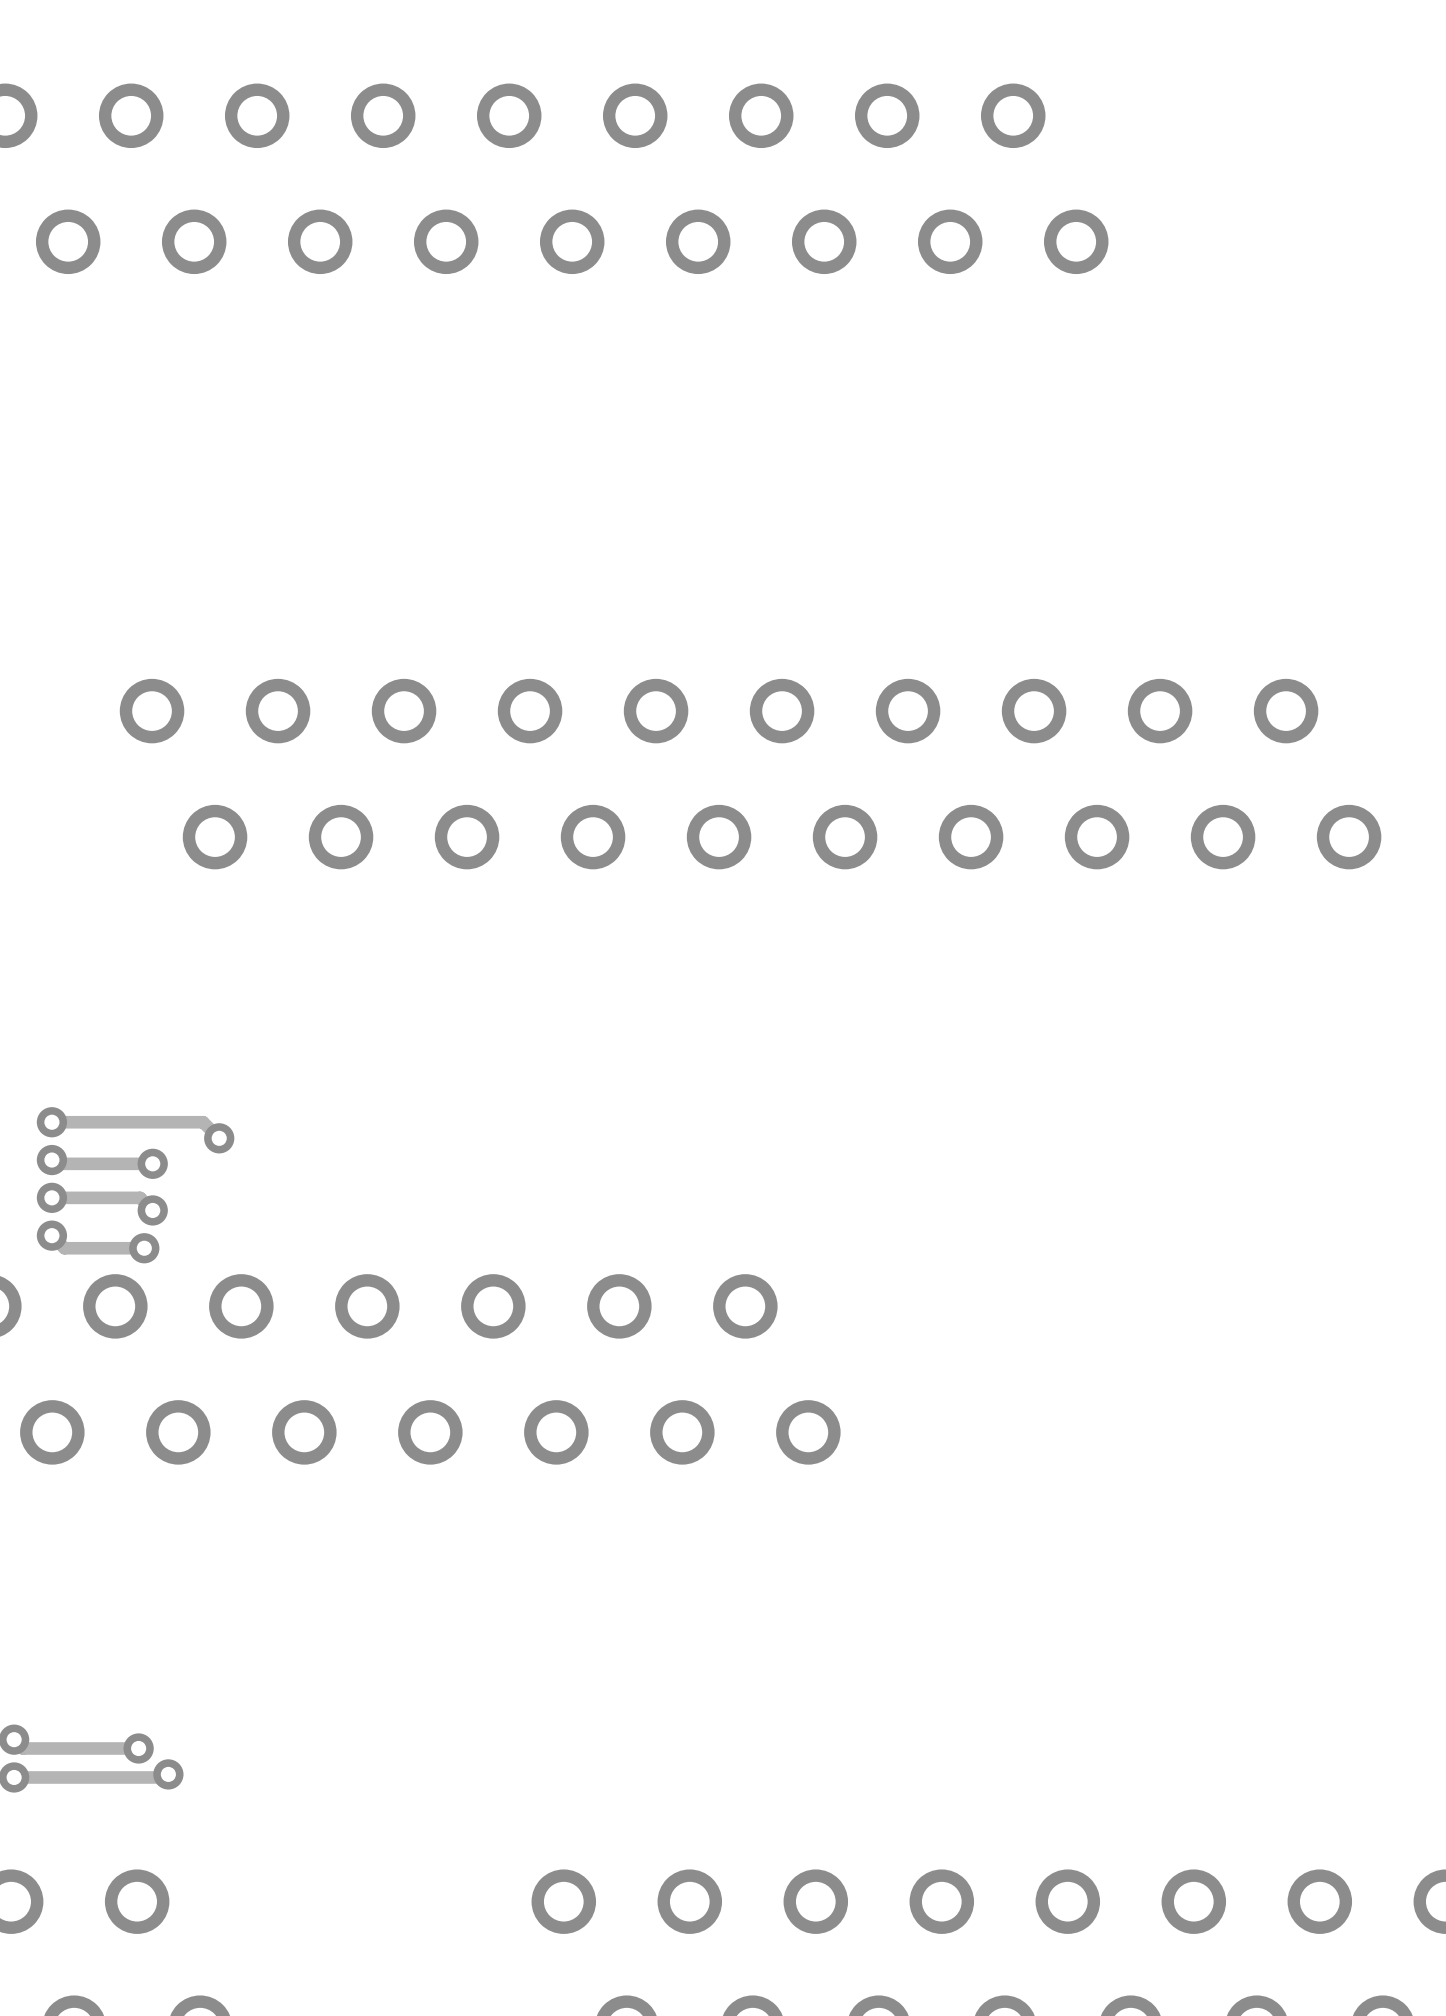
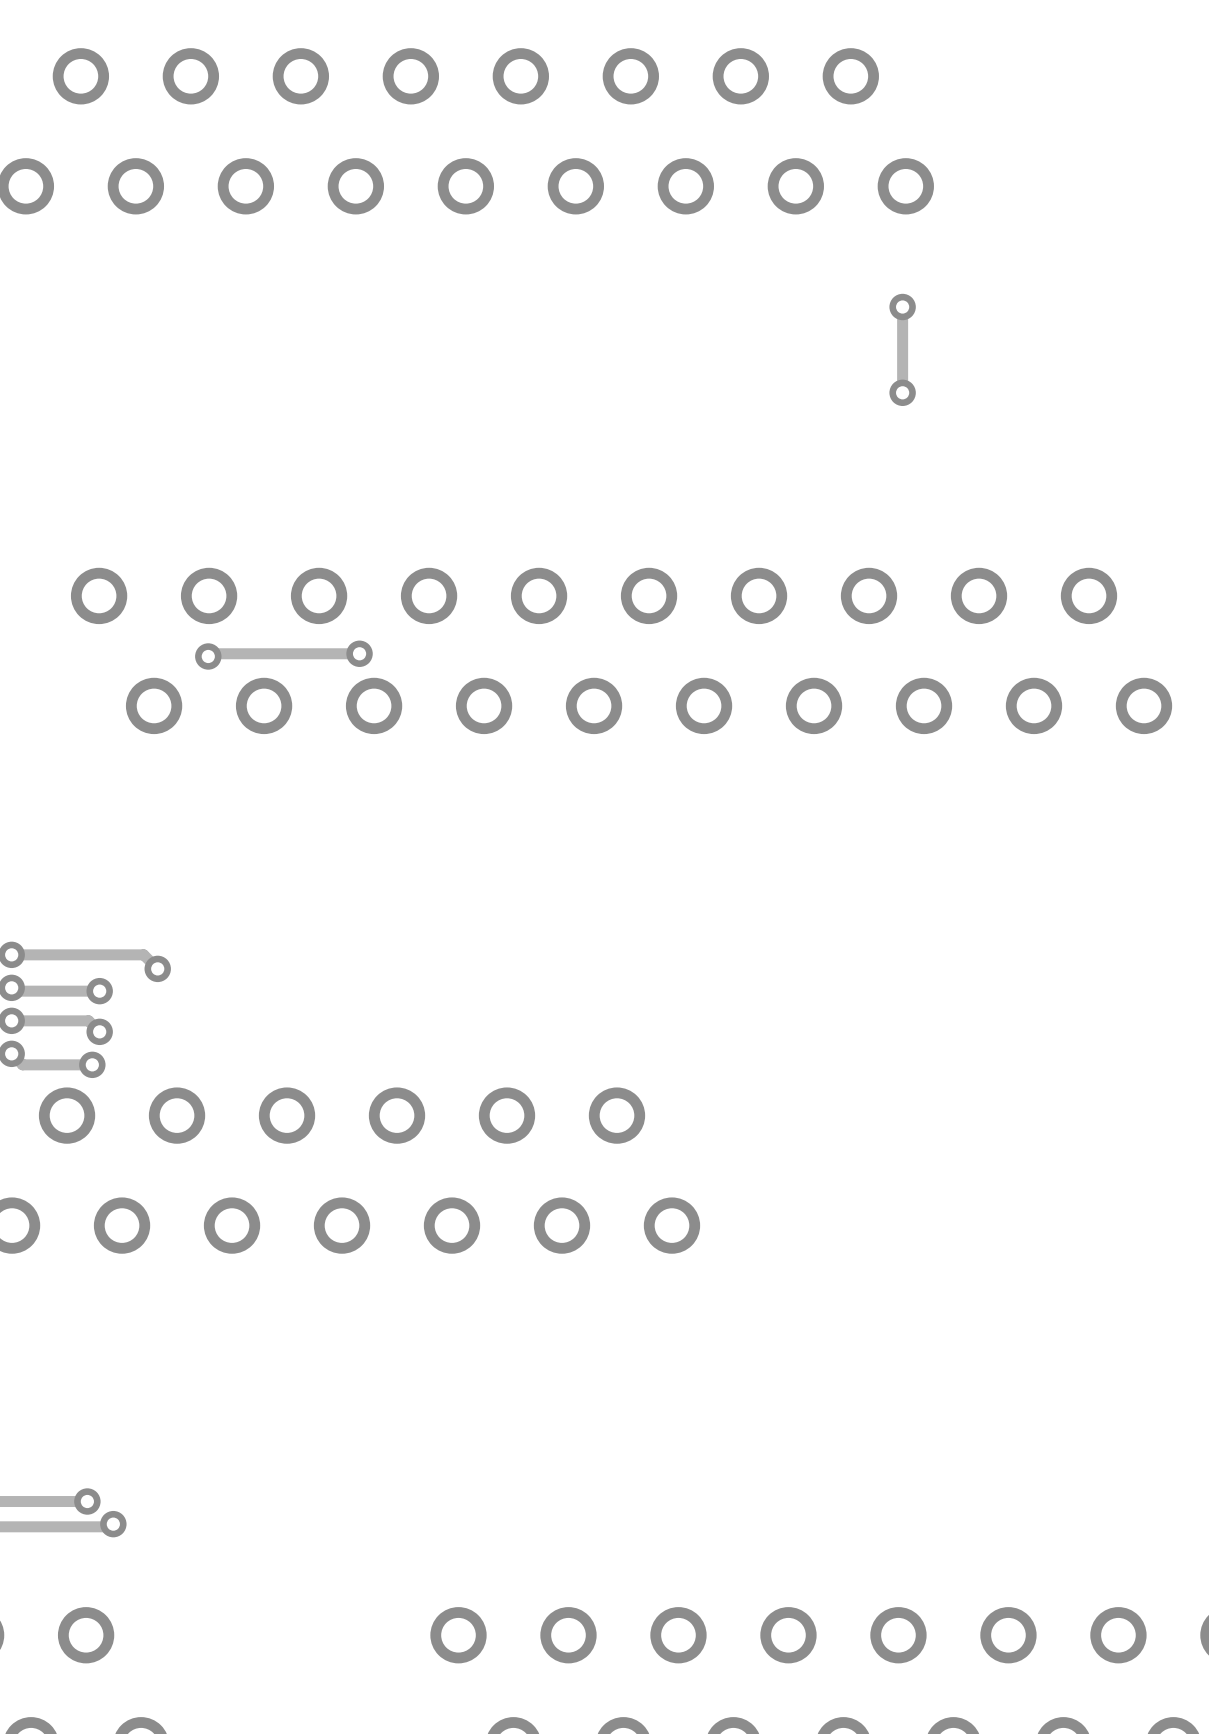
track: none -> (902, 307) (902, 392)
via: none -> (902, 307)
via: none -> (902, 392)
track: none -> (359, 653) (211, 653) (208, 656)
via: none -> (359, 653)
via: none -> (208, 656)

